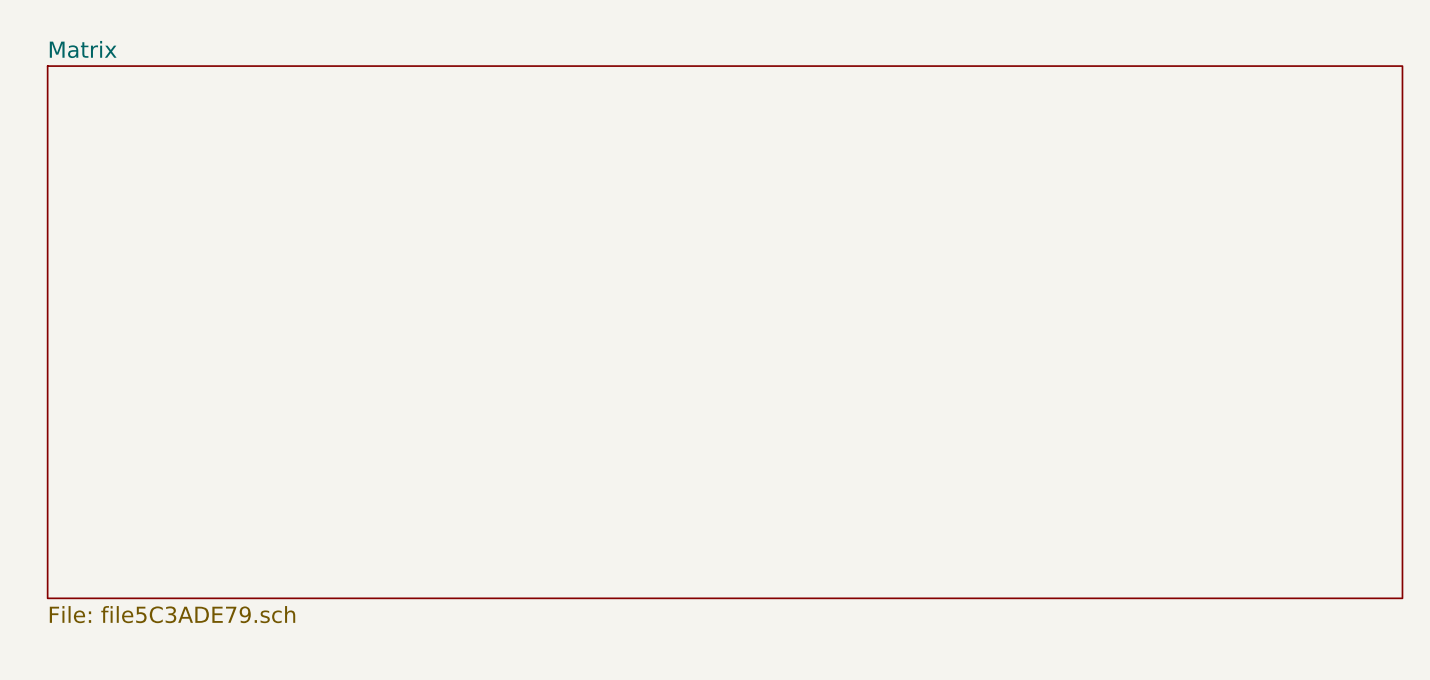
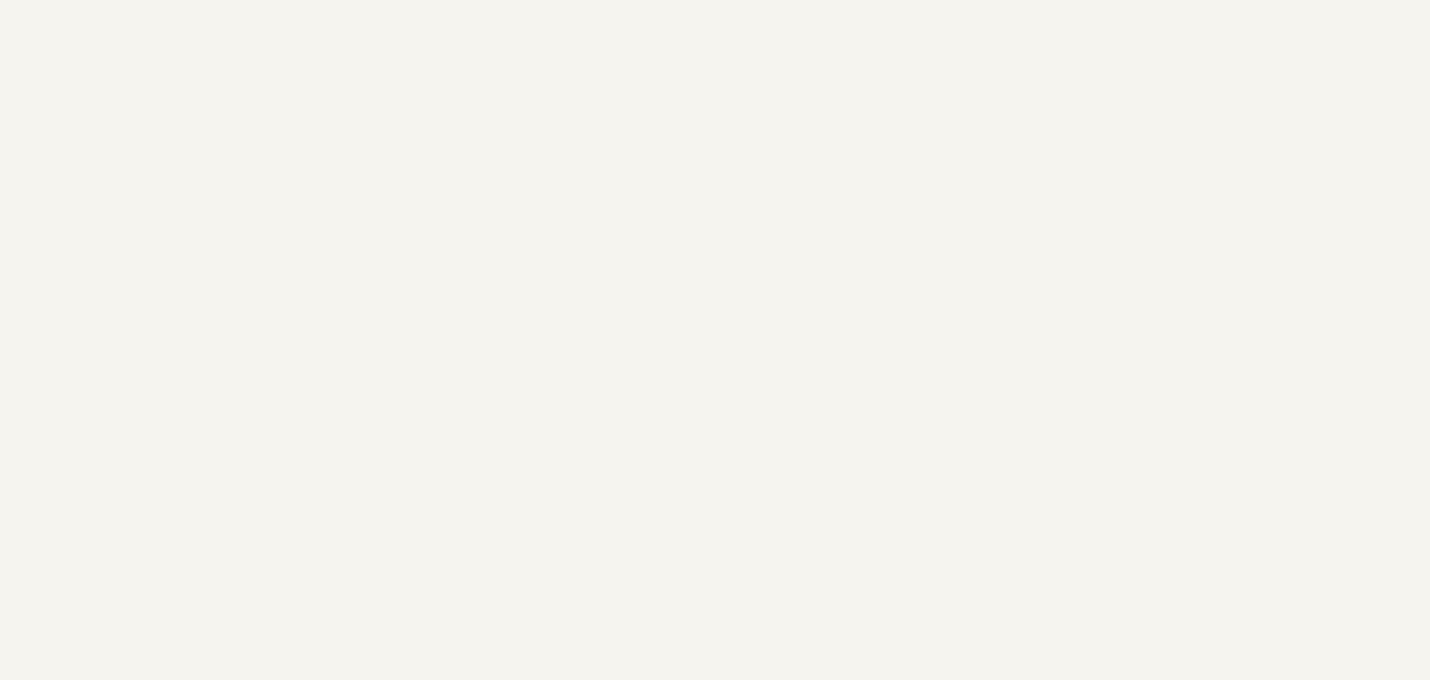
sheet Matrix: File: file5C3ADE79.sch (725, 332) -> none

